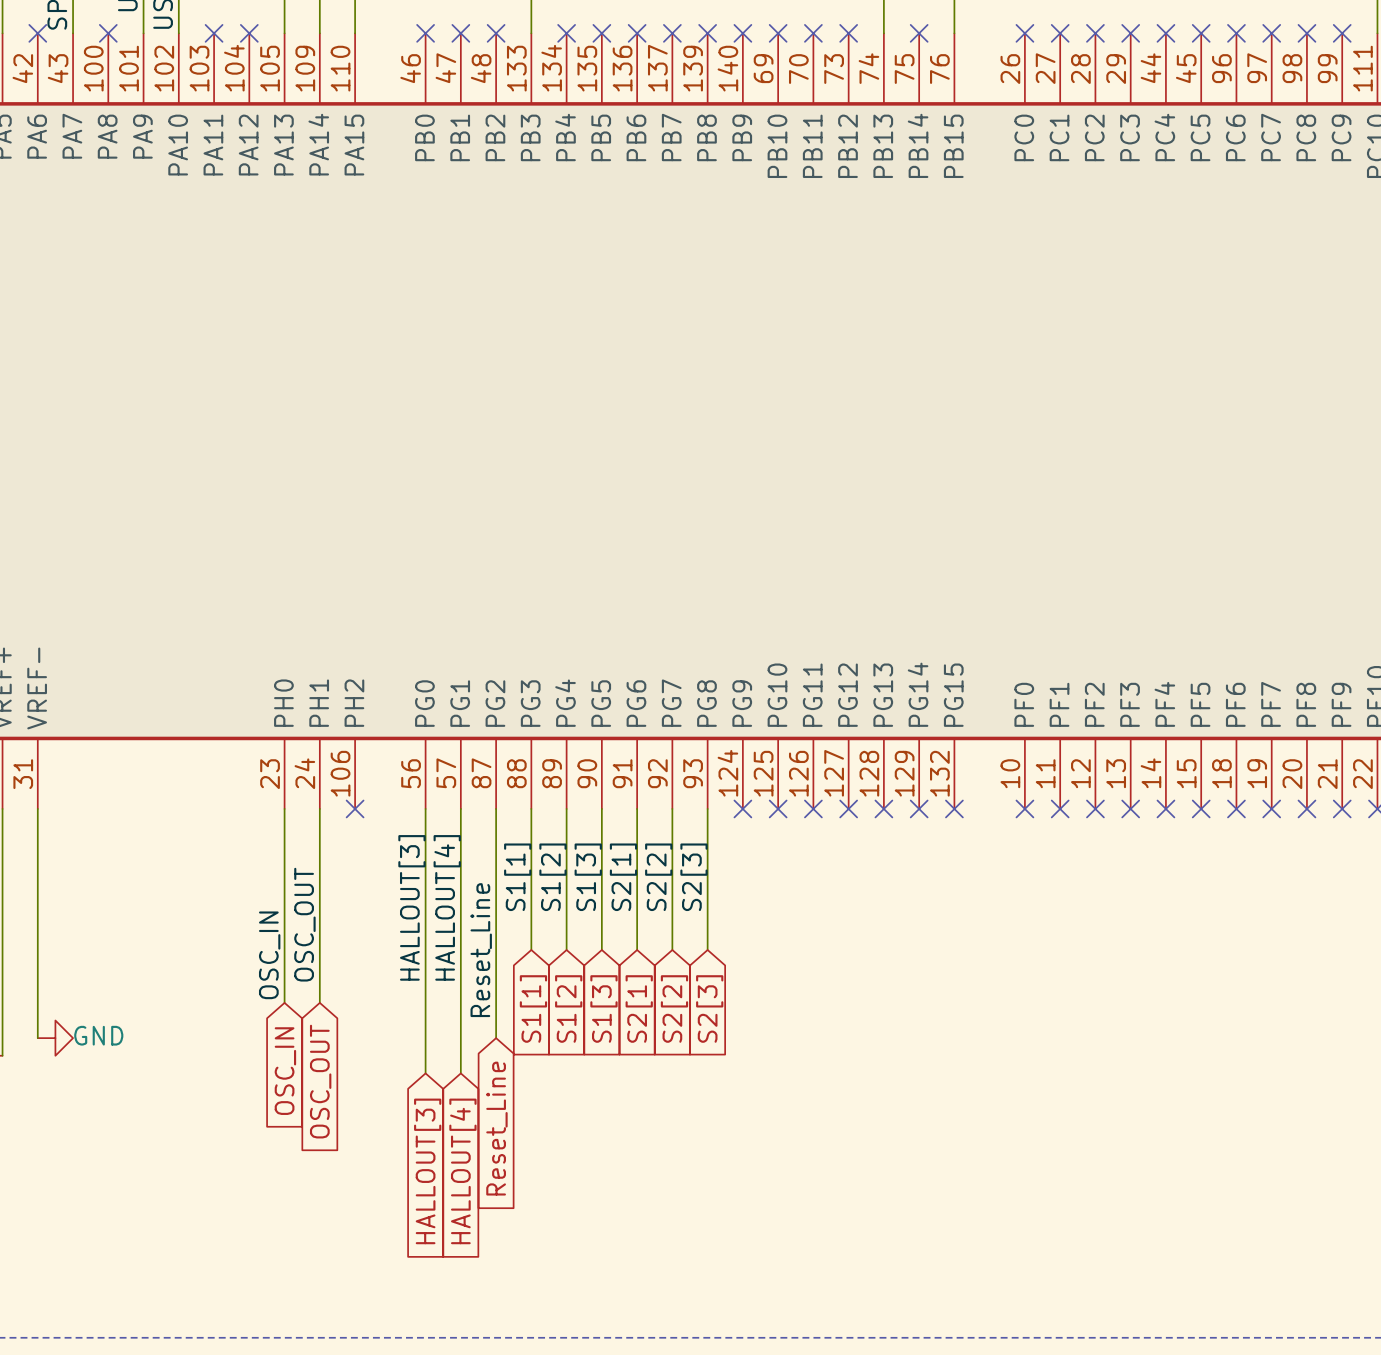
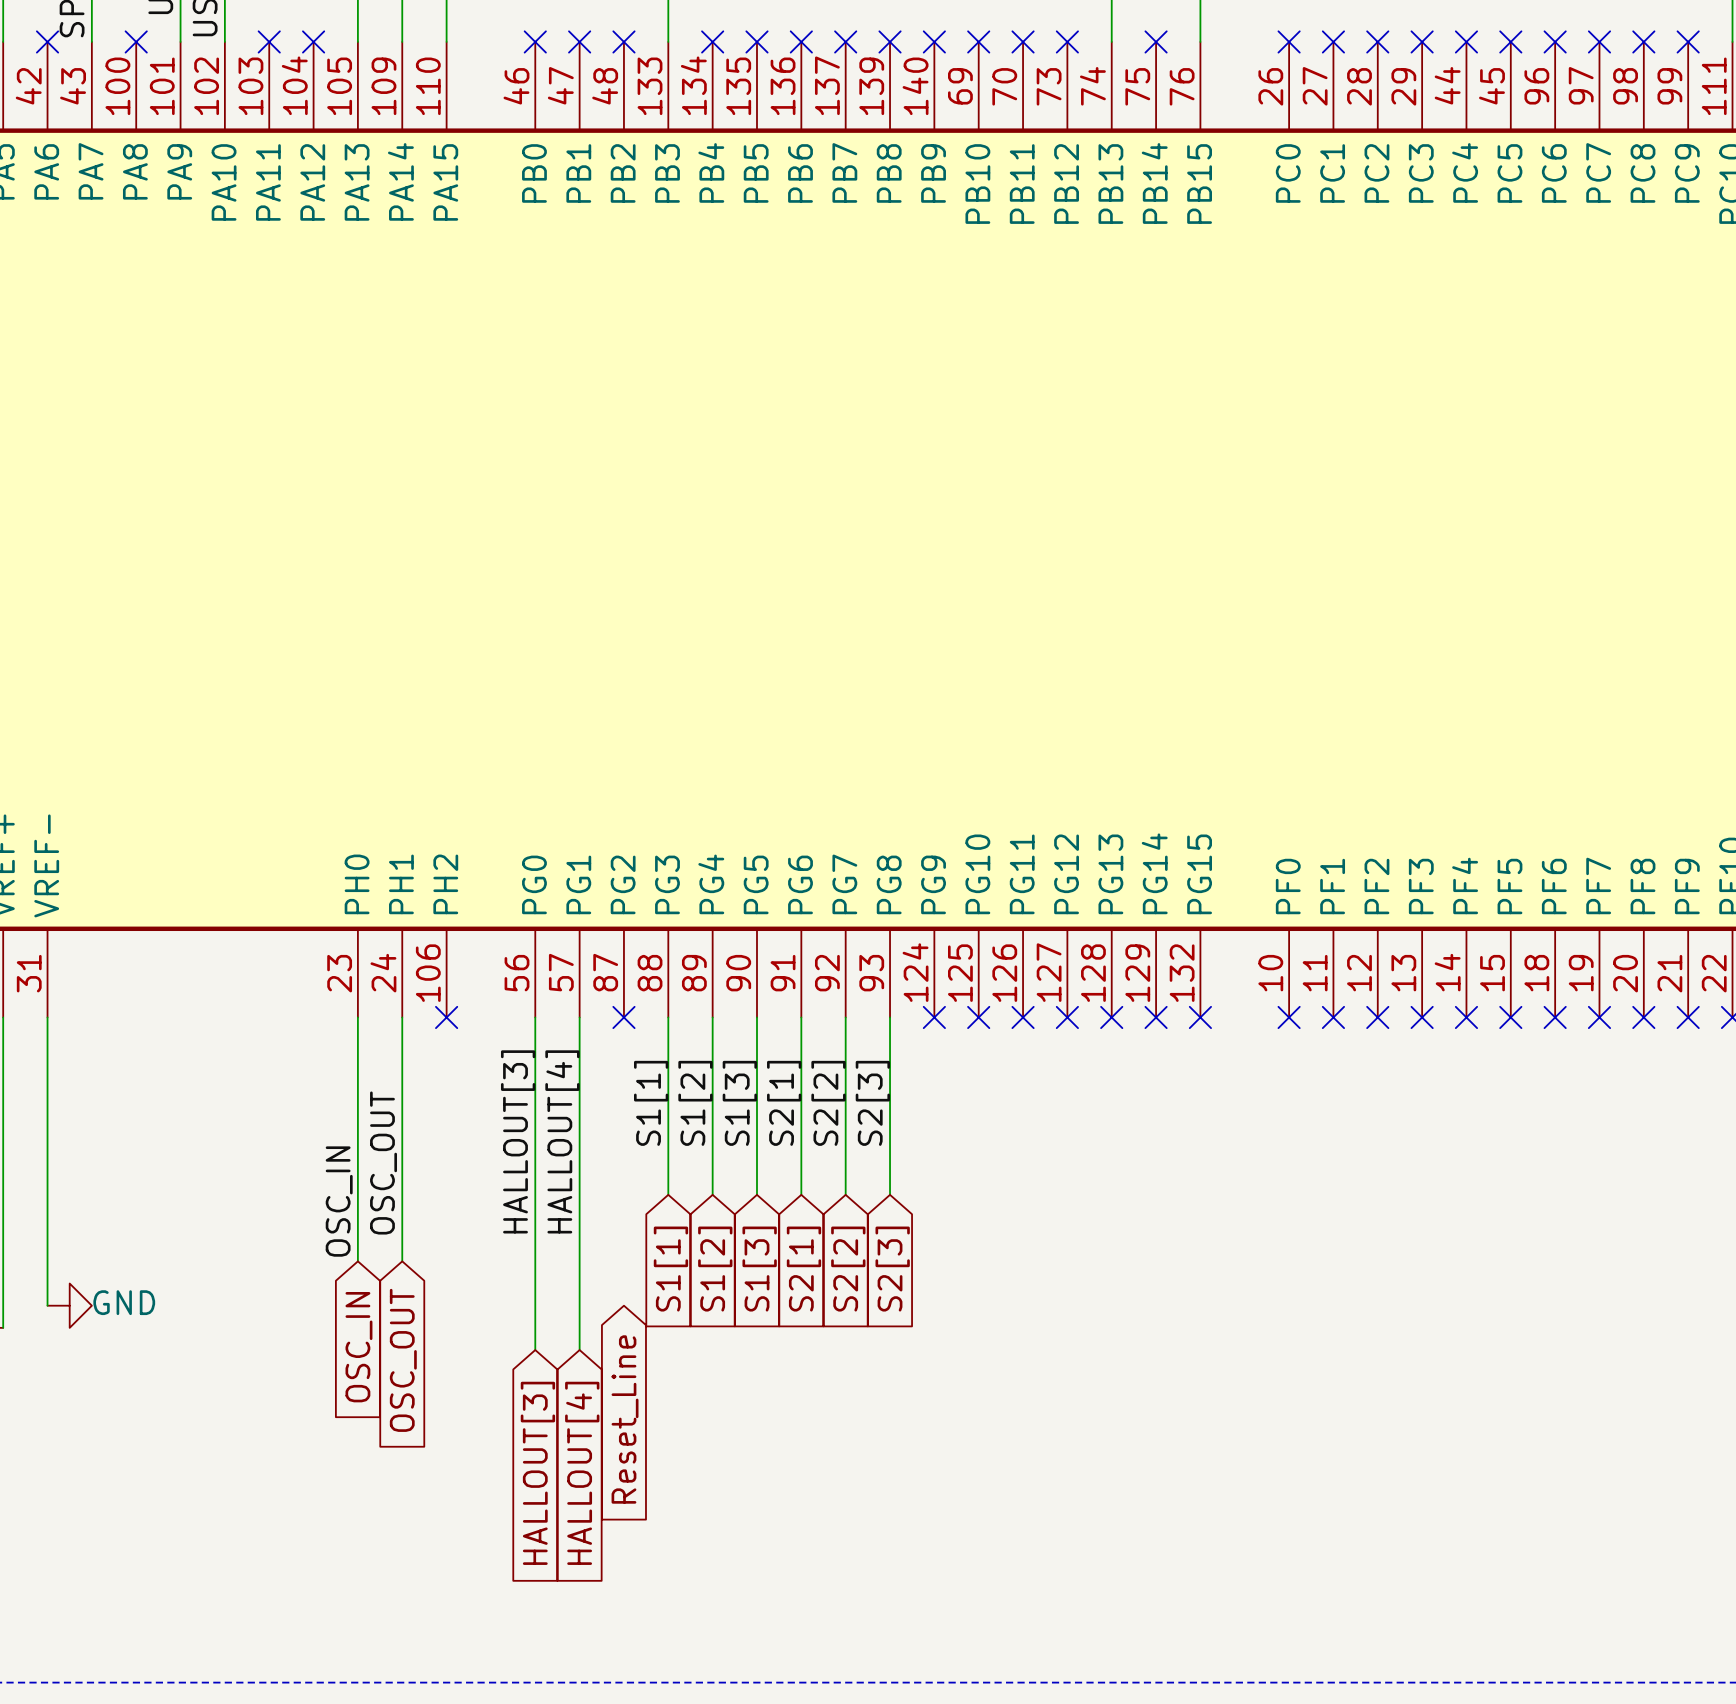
wire: (496, 808) (496, 1038) -> none
no-connect mark: none -> (623, 1017)
label: Reset_Line (481, 950) -> none

